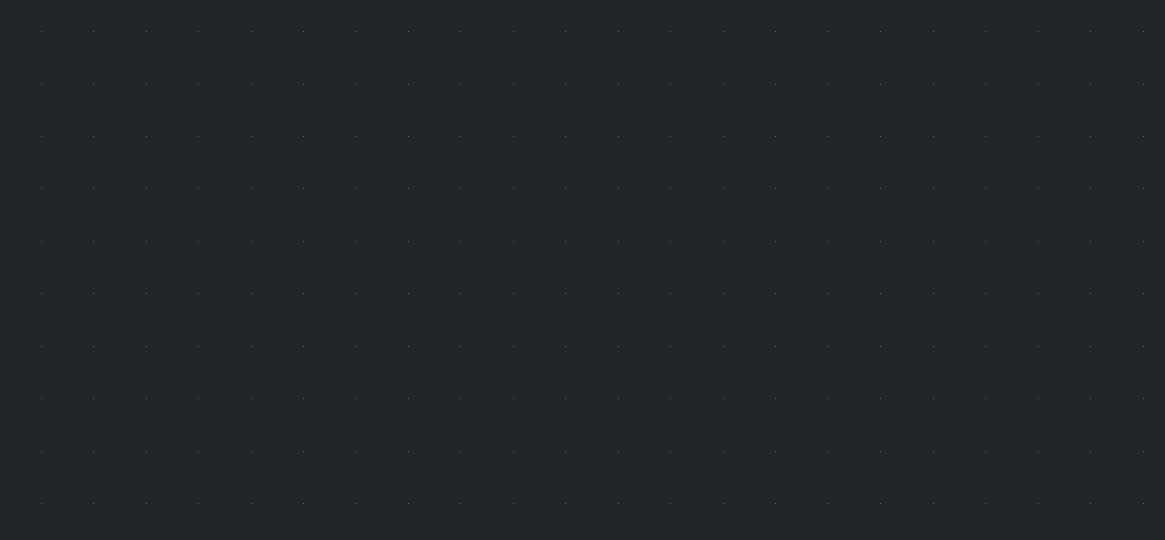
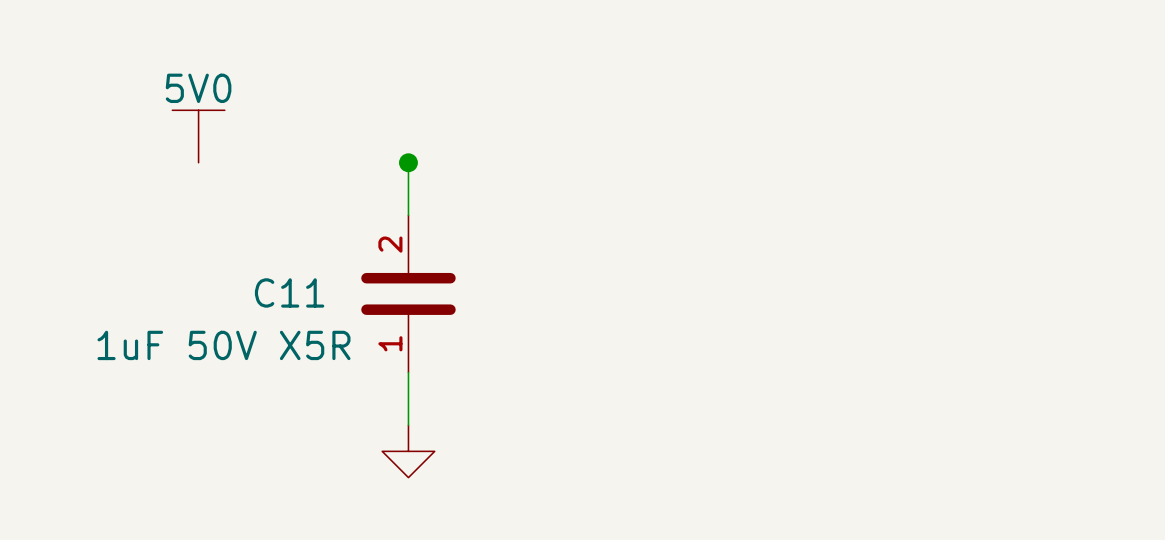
power symbol: none -> 5V0 (198, 136)
wire: none -> (408, 162) (408, 215)
junction: none -> (408, 162)
C11: none -> 1uF 50V X5R (408, 293)
wire: none -> (408, 372) (408, 425)
power symbol: none -> (408, 451)

